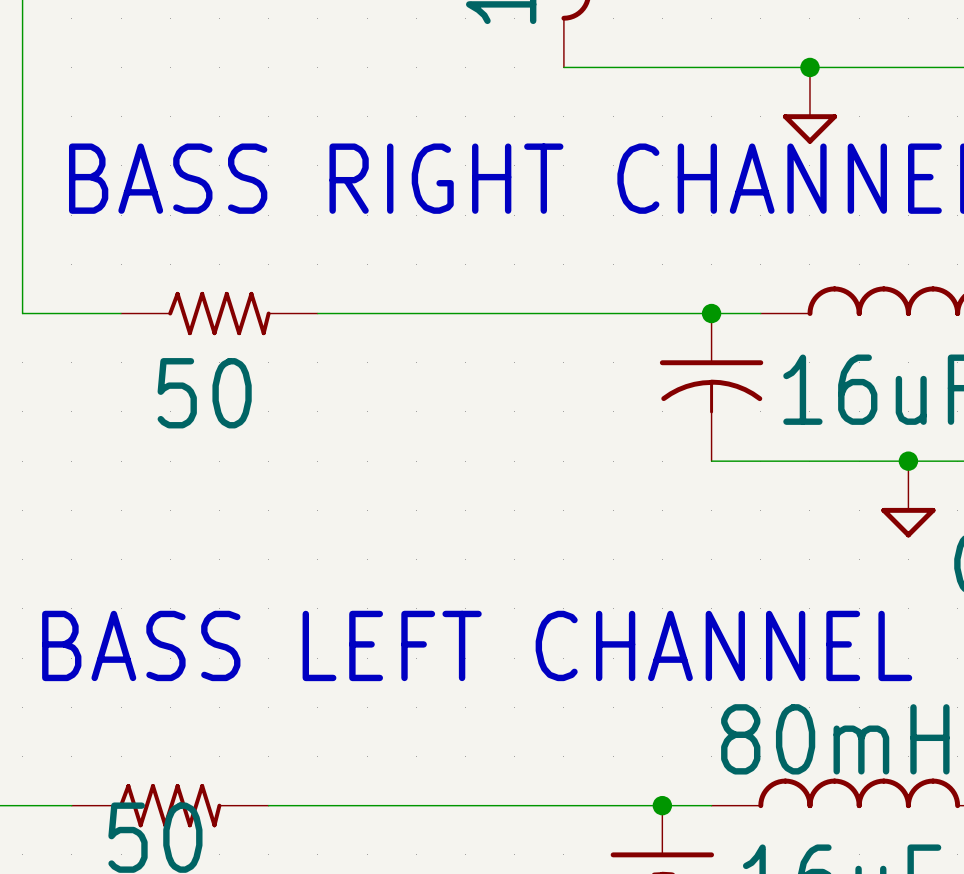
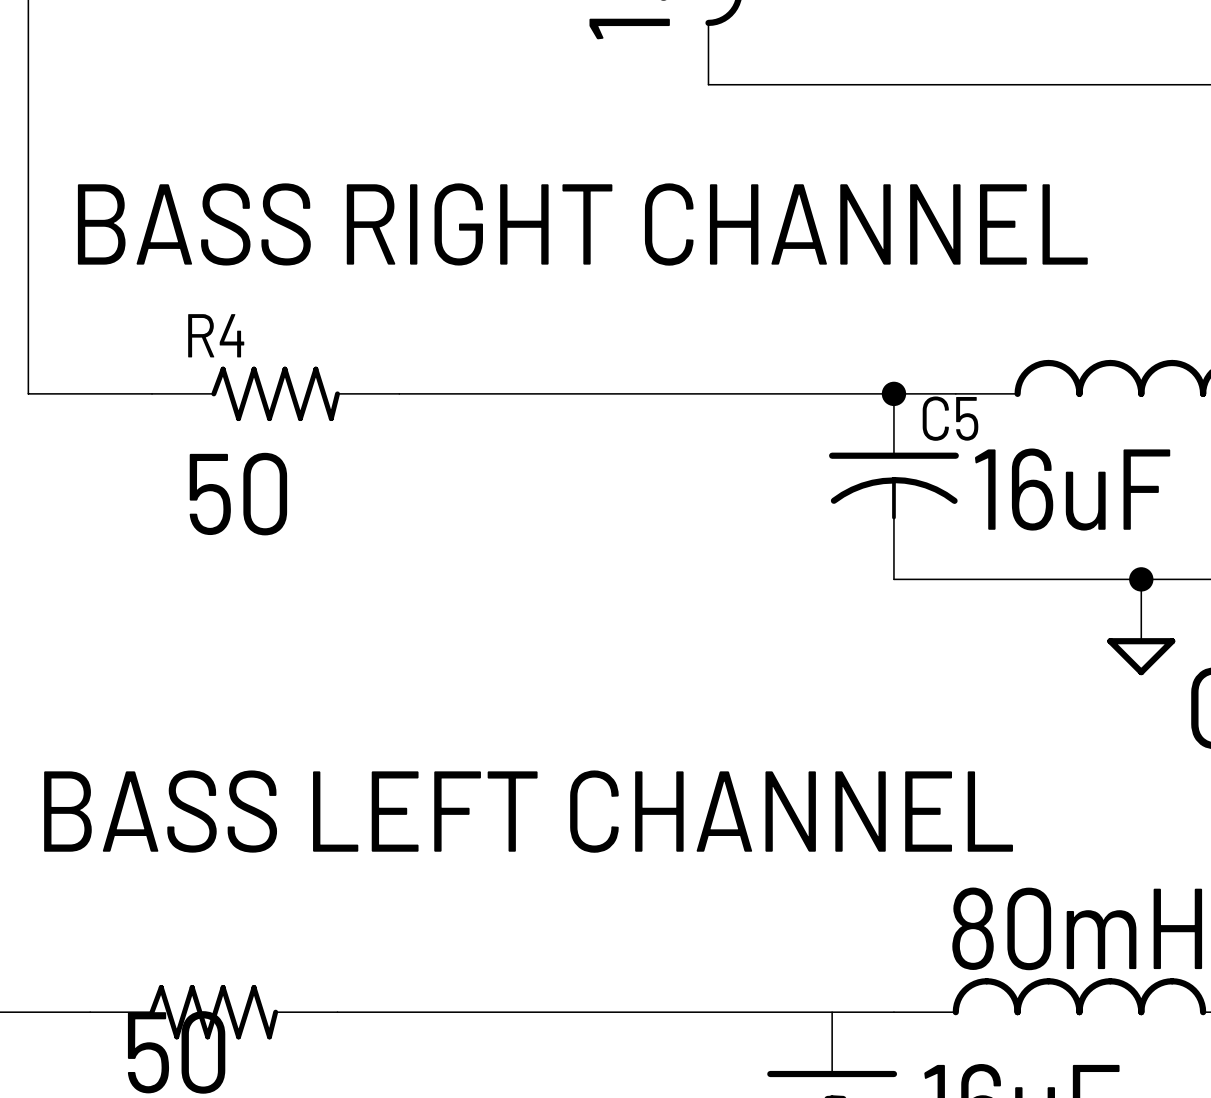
junction: (809, 67) -> none
power symbol: (809, 105) -> none
R4 name: none -> R4 (216, 335)
C5 name: none -> C5 (950, 418)
junction: (662, 805) -> none

